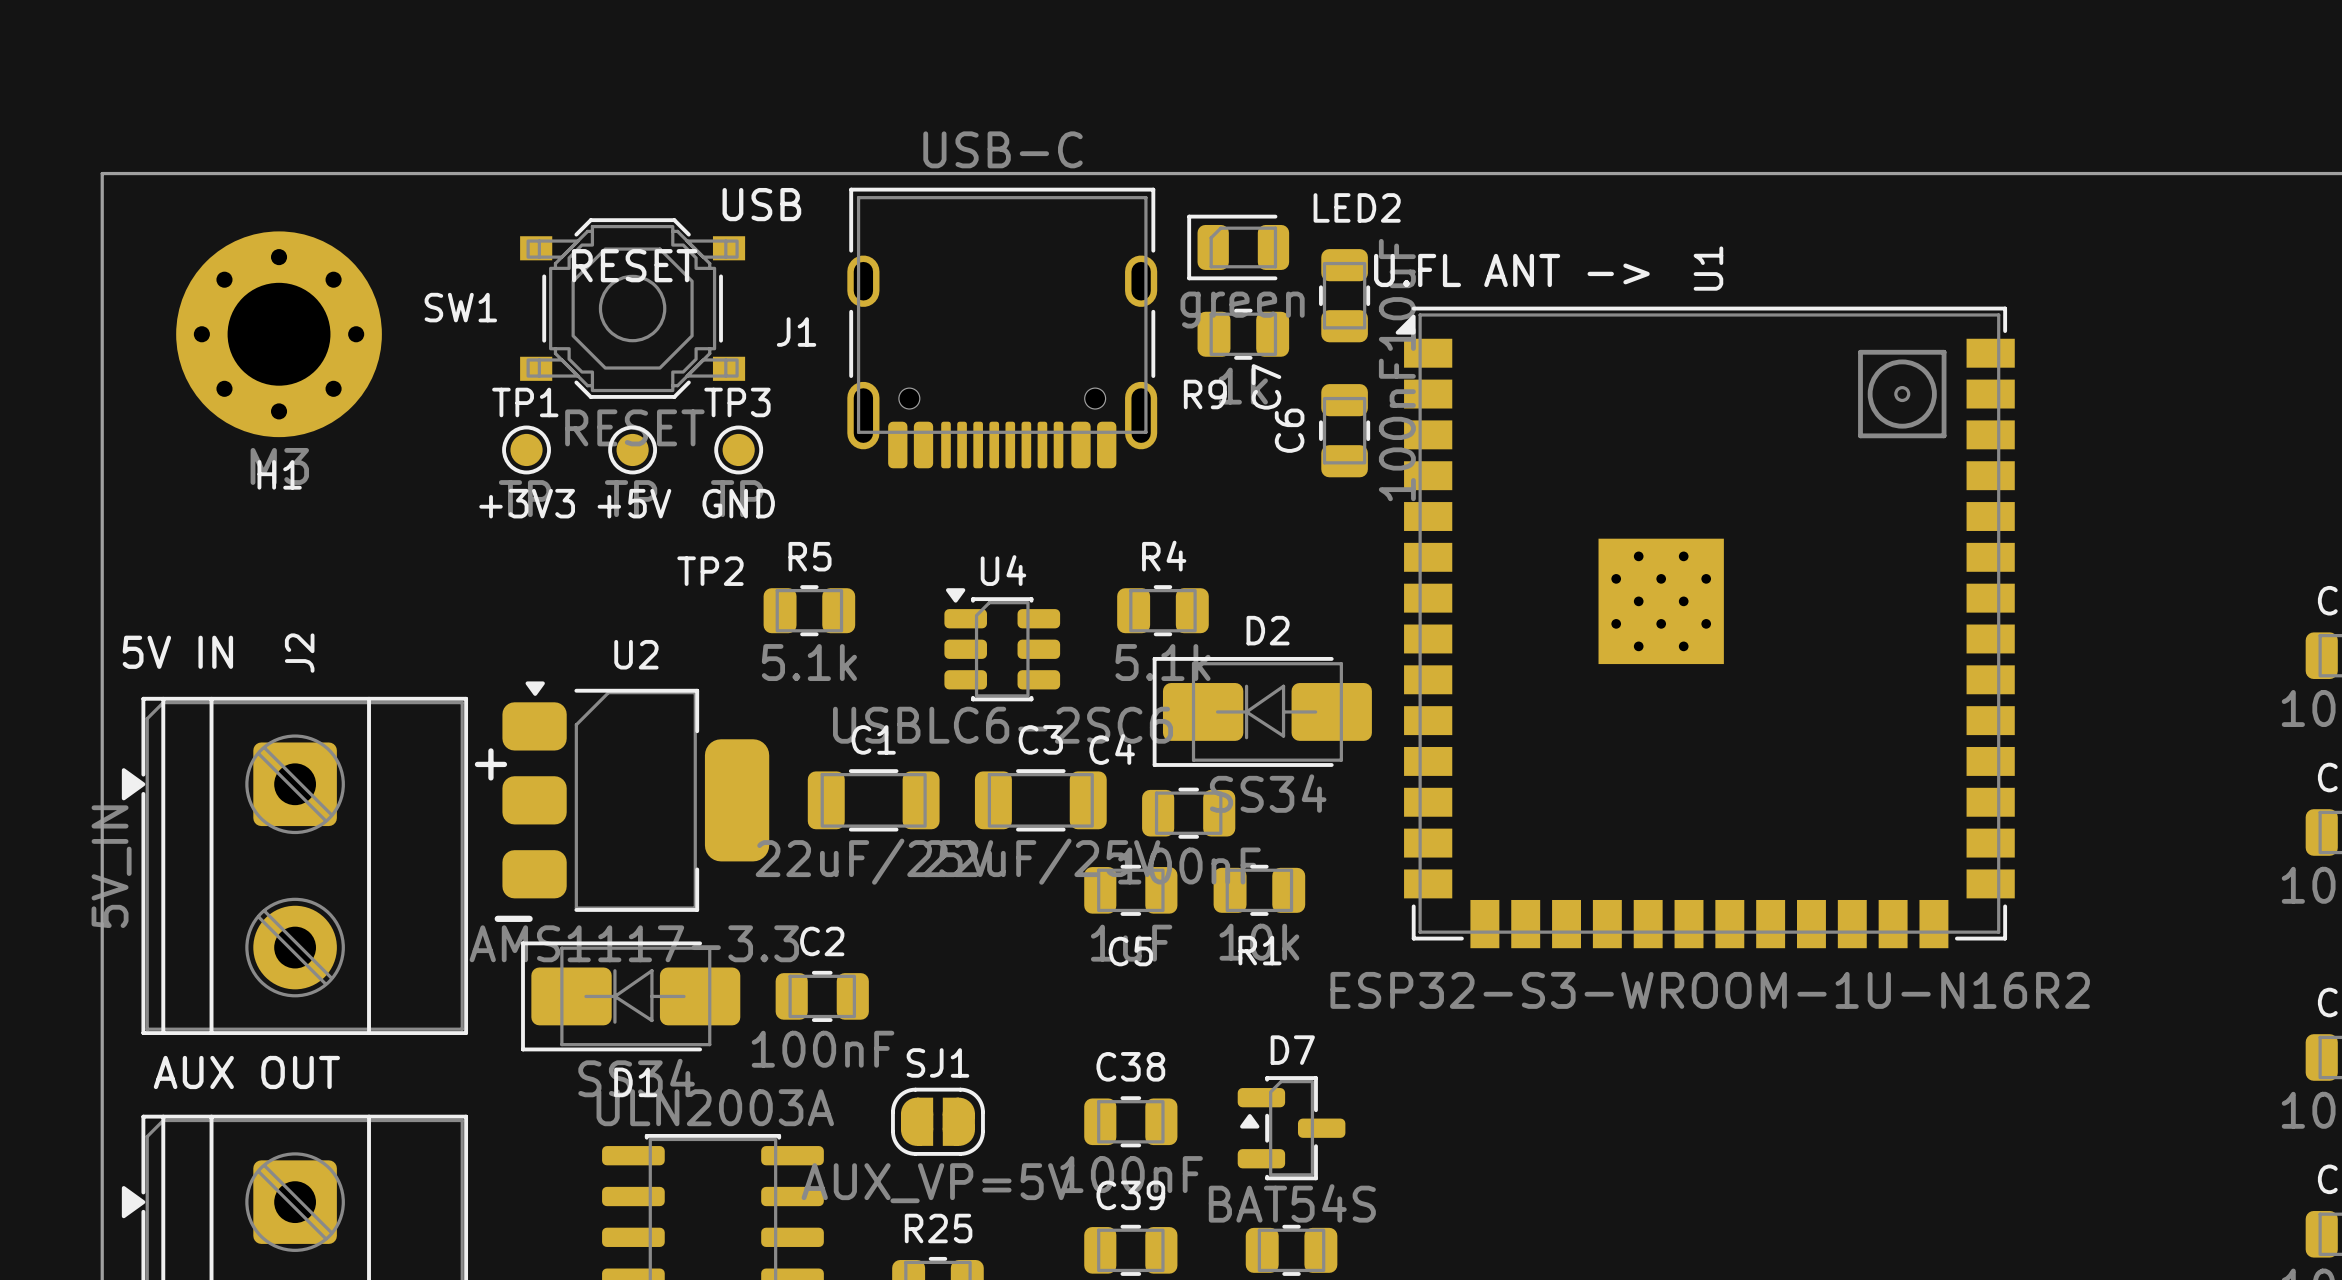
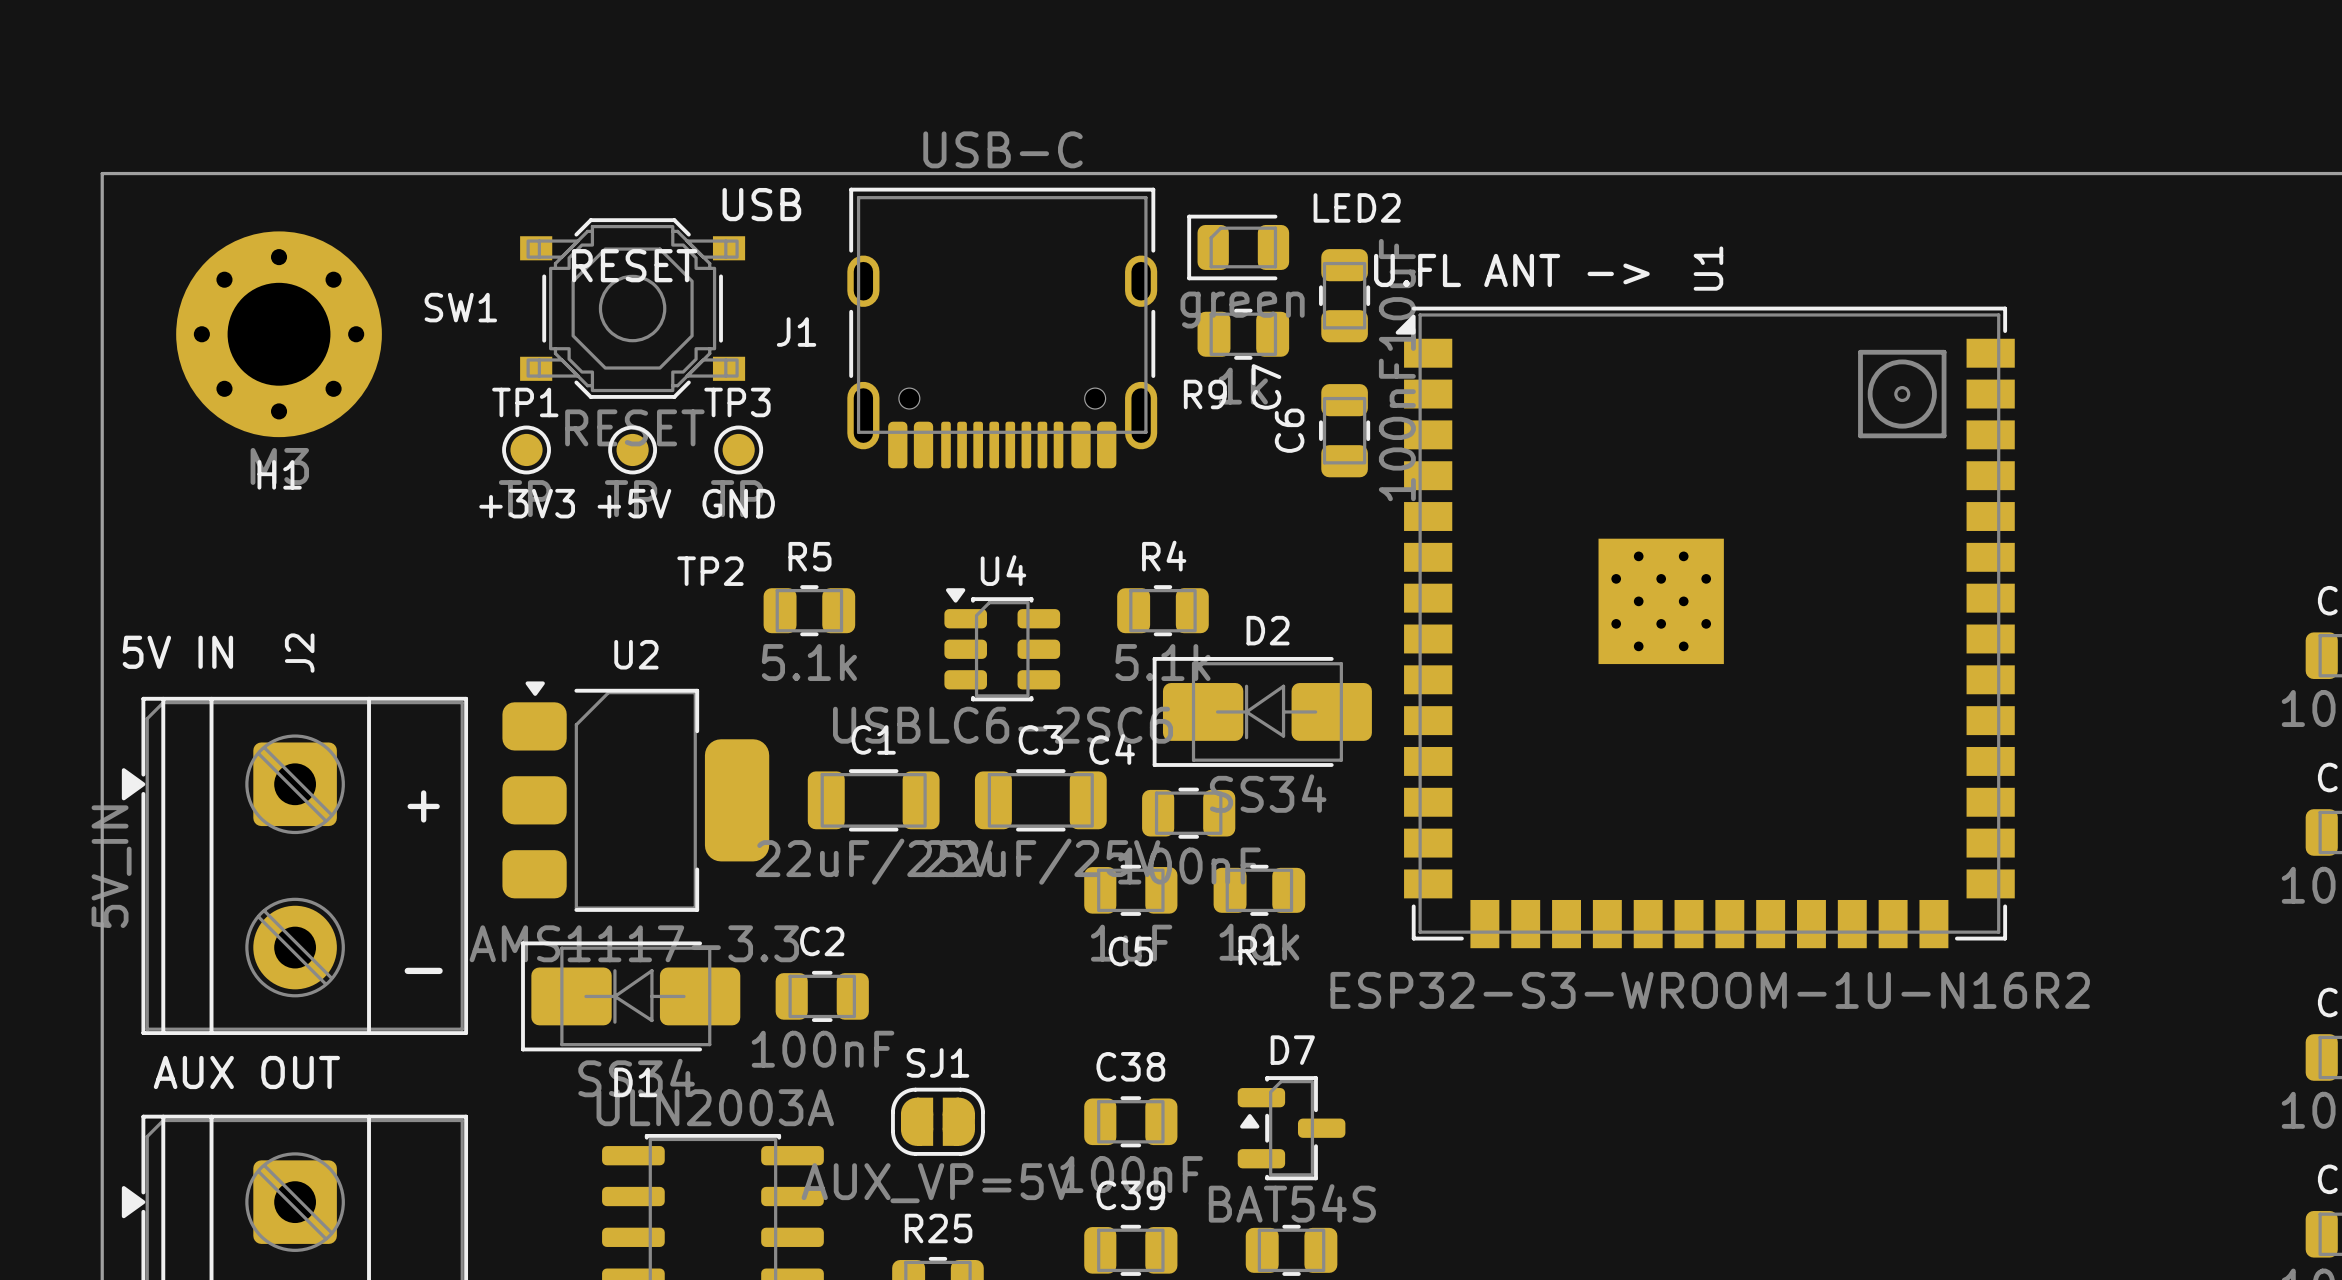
text position: + (490, 764) -> + (423, 806)
text position: - (513, 918) -> - (423, 970)

